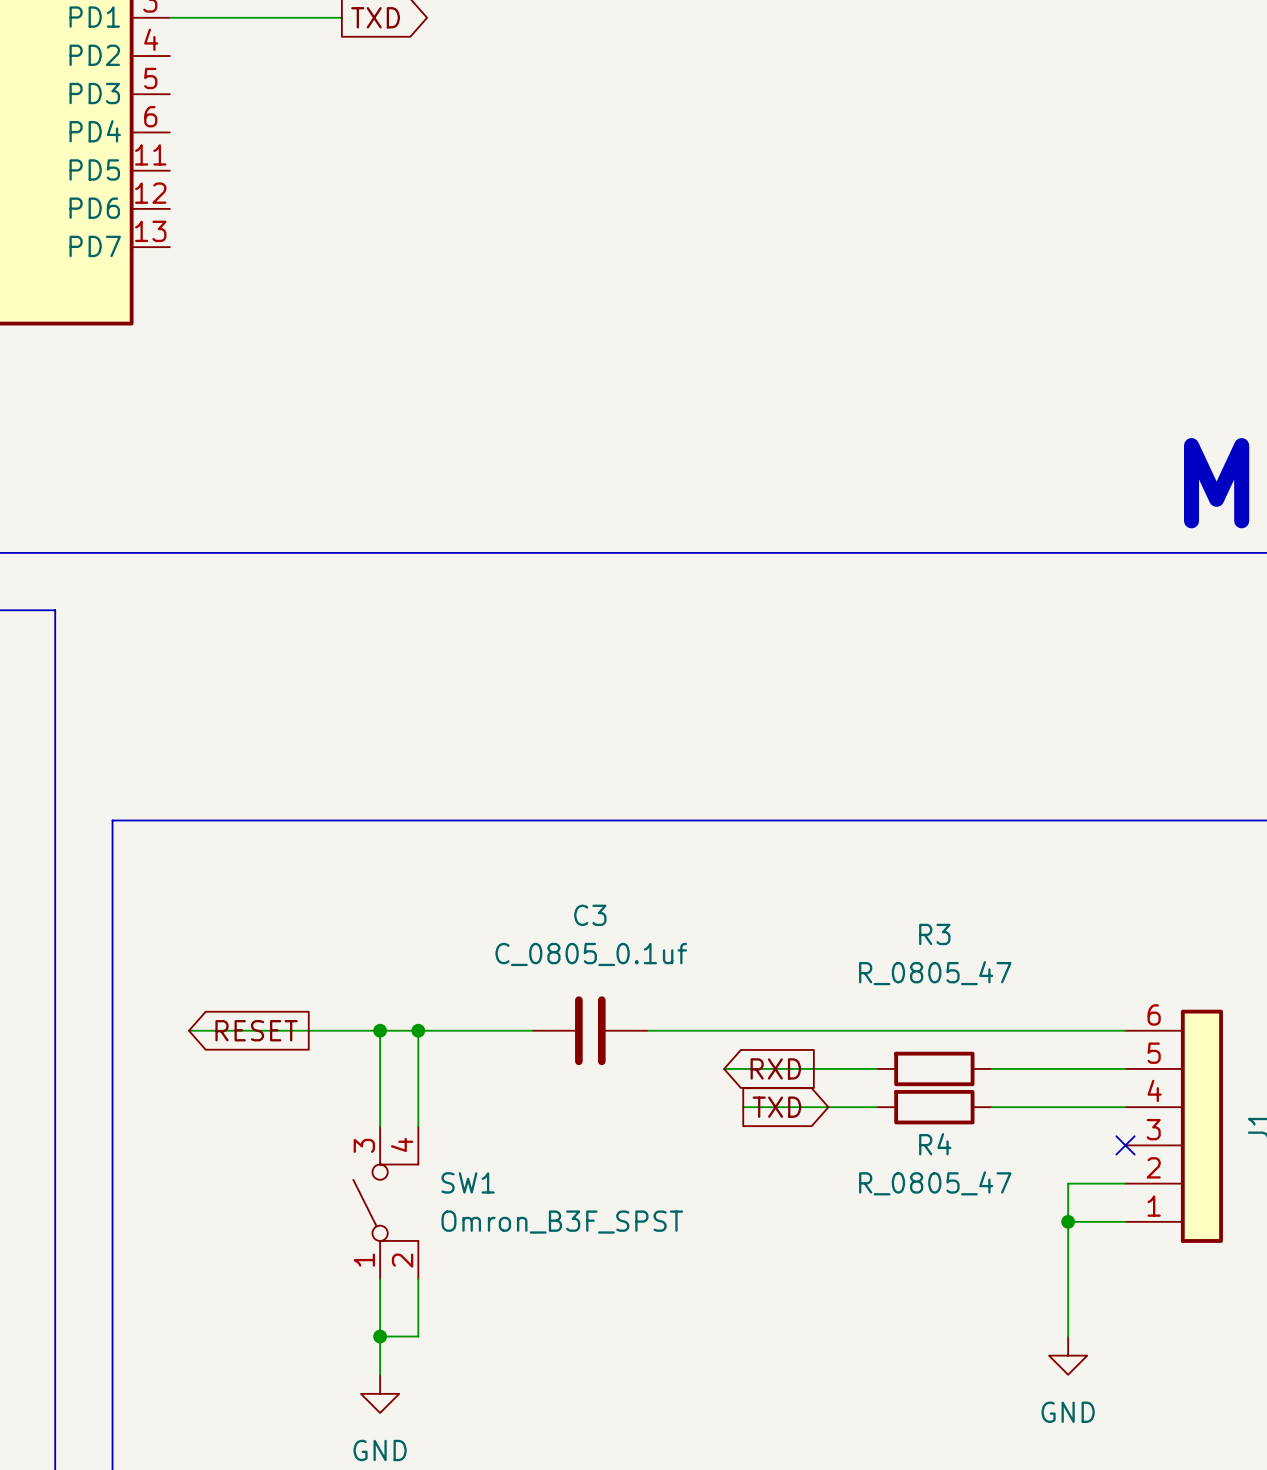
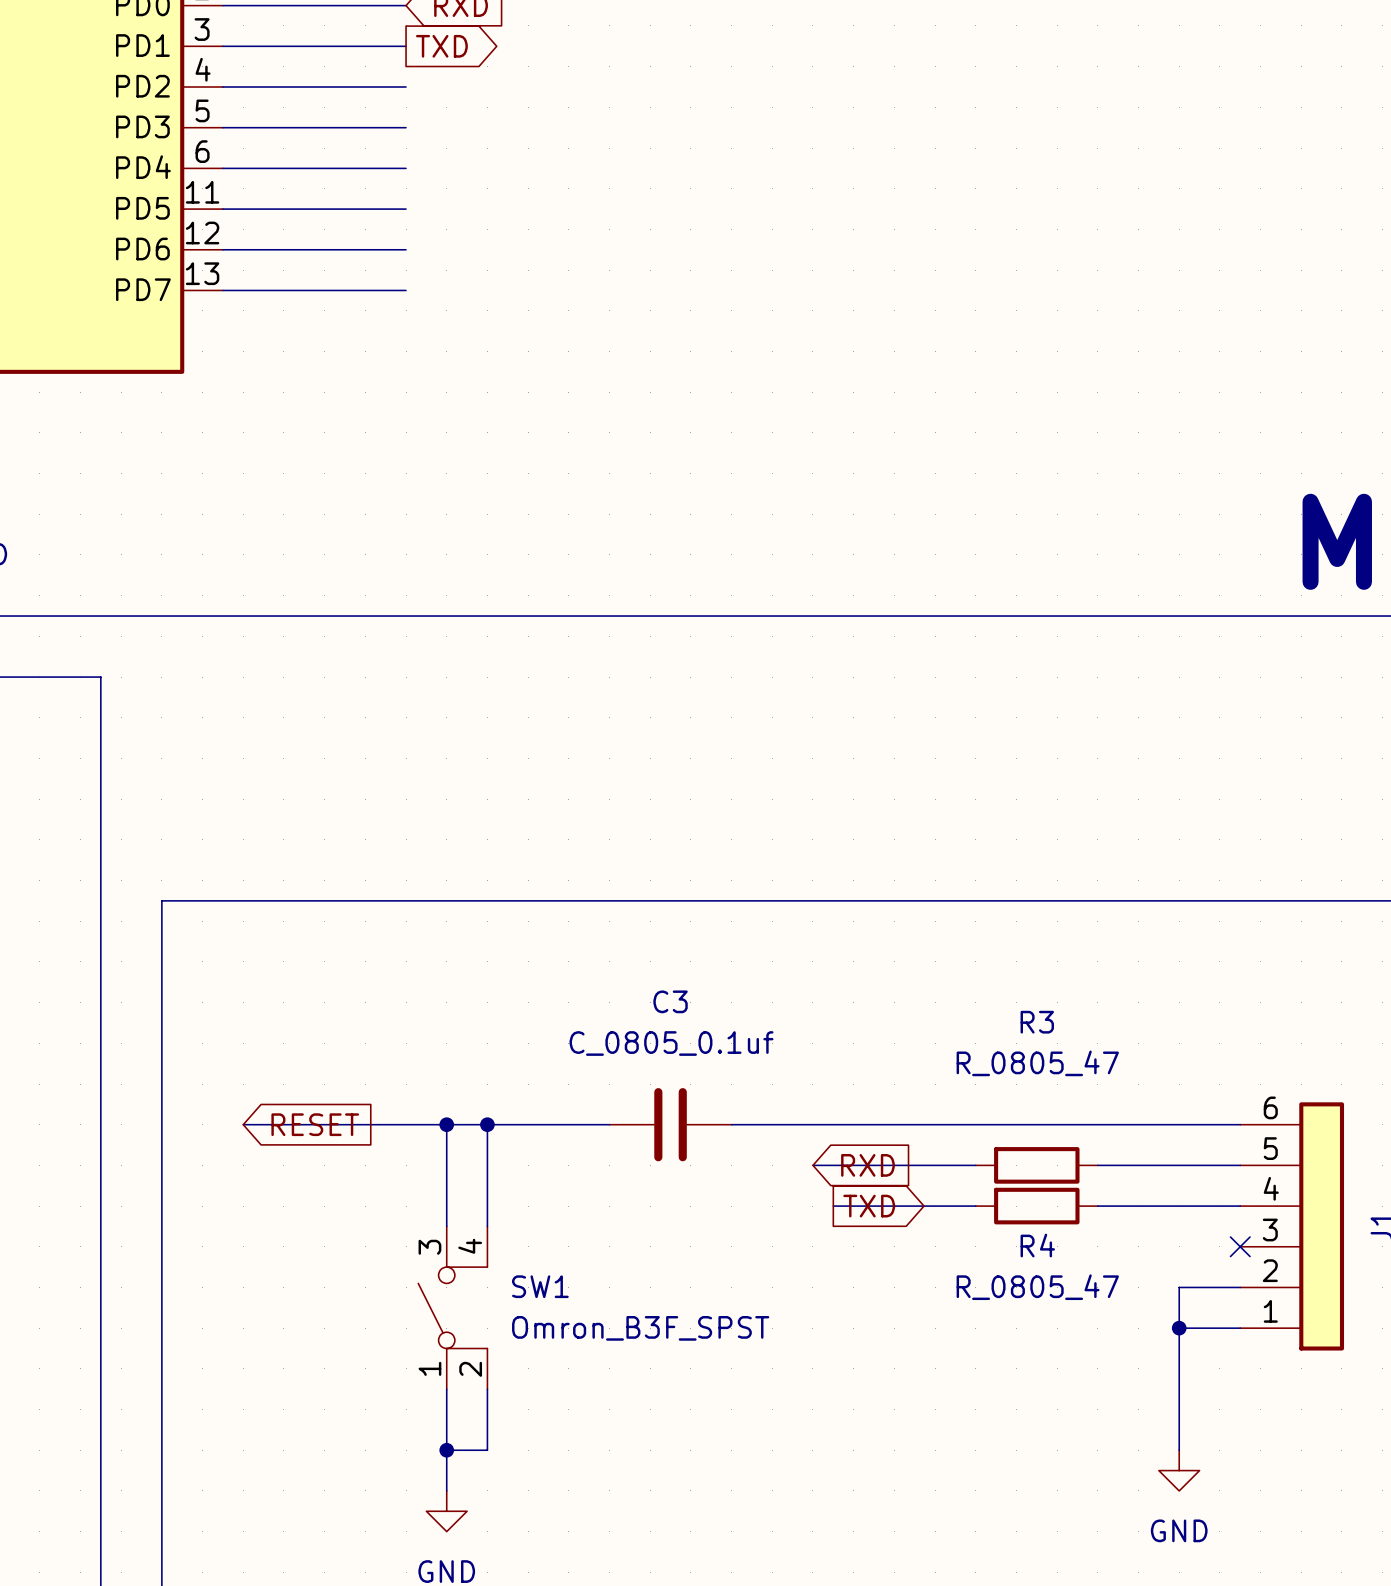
wire: none -> (222, 87) (406, 87)
wire: none -> (222, 127) (406, 127)
wire: none -> (222, 168) (406, 168)
wire: none -> (222, 209) (406, 209)
wire: none -> (222, 249) (406, 249)
wire: none -> (222, 290) (406, 290)

